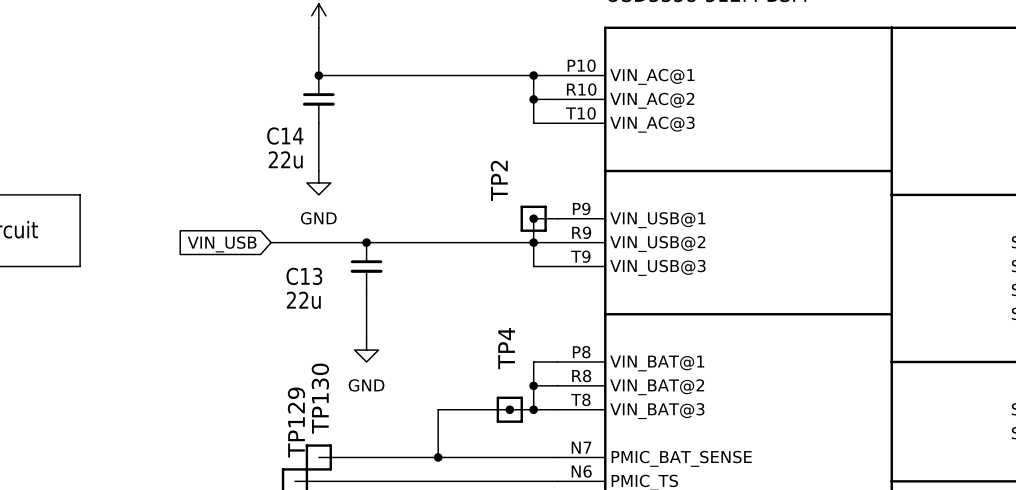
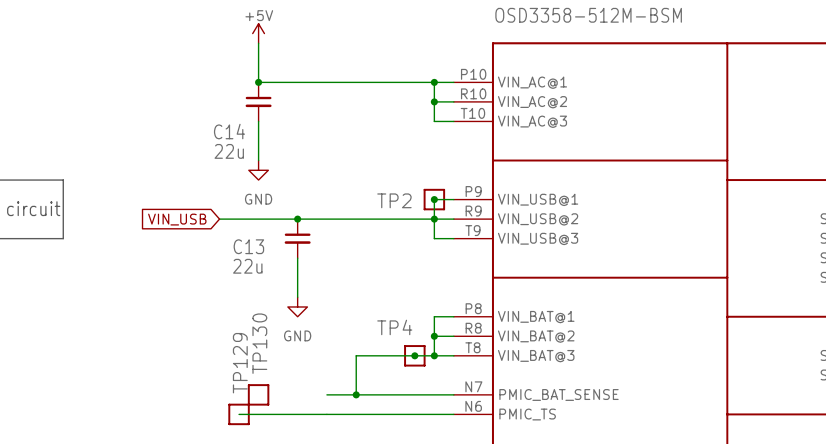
TP2 name rotation: 0° (499, 180) -> 90° clockwise (394, 200)
TP4 name rotation: 0° (506, 348) -> 90° clockwise (394, 327)
wire: (318, 457) (402, 457) -> none

